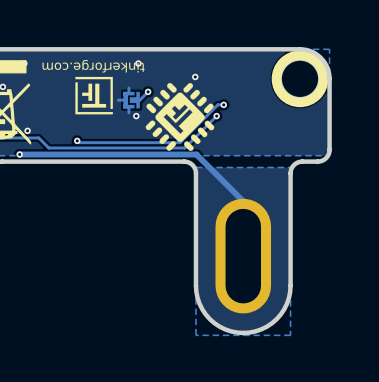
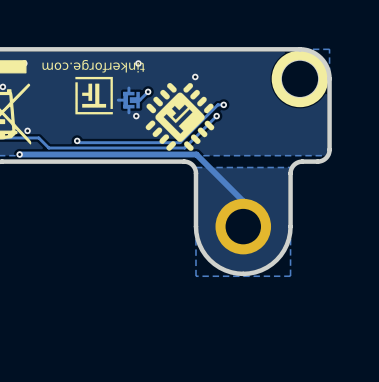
part: none -> (243, 226)
board edge: (290, 226) (290, 285) (286, 303) (280, 314) (266, 326) (255, 331) (243, 332) (225, 329) (214, 323) (205, 314) (199, 303) (196, 285) (196, 226) -> (290, 226) (286, 244) (276, 260) (261, 270) (243, 273) (225, 270) (209, 260) (199, 244) (196, 226)
part: (243, 256) -> none
zone outline: (290, 276) (290, 335) (196, 335) (196, 276) -> (290, 276) (196, 276)

